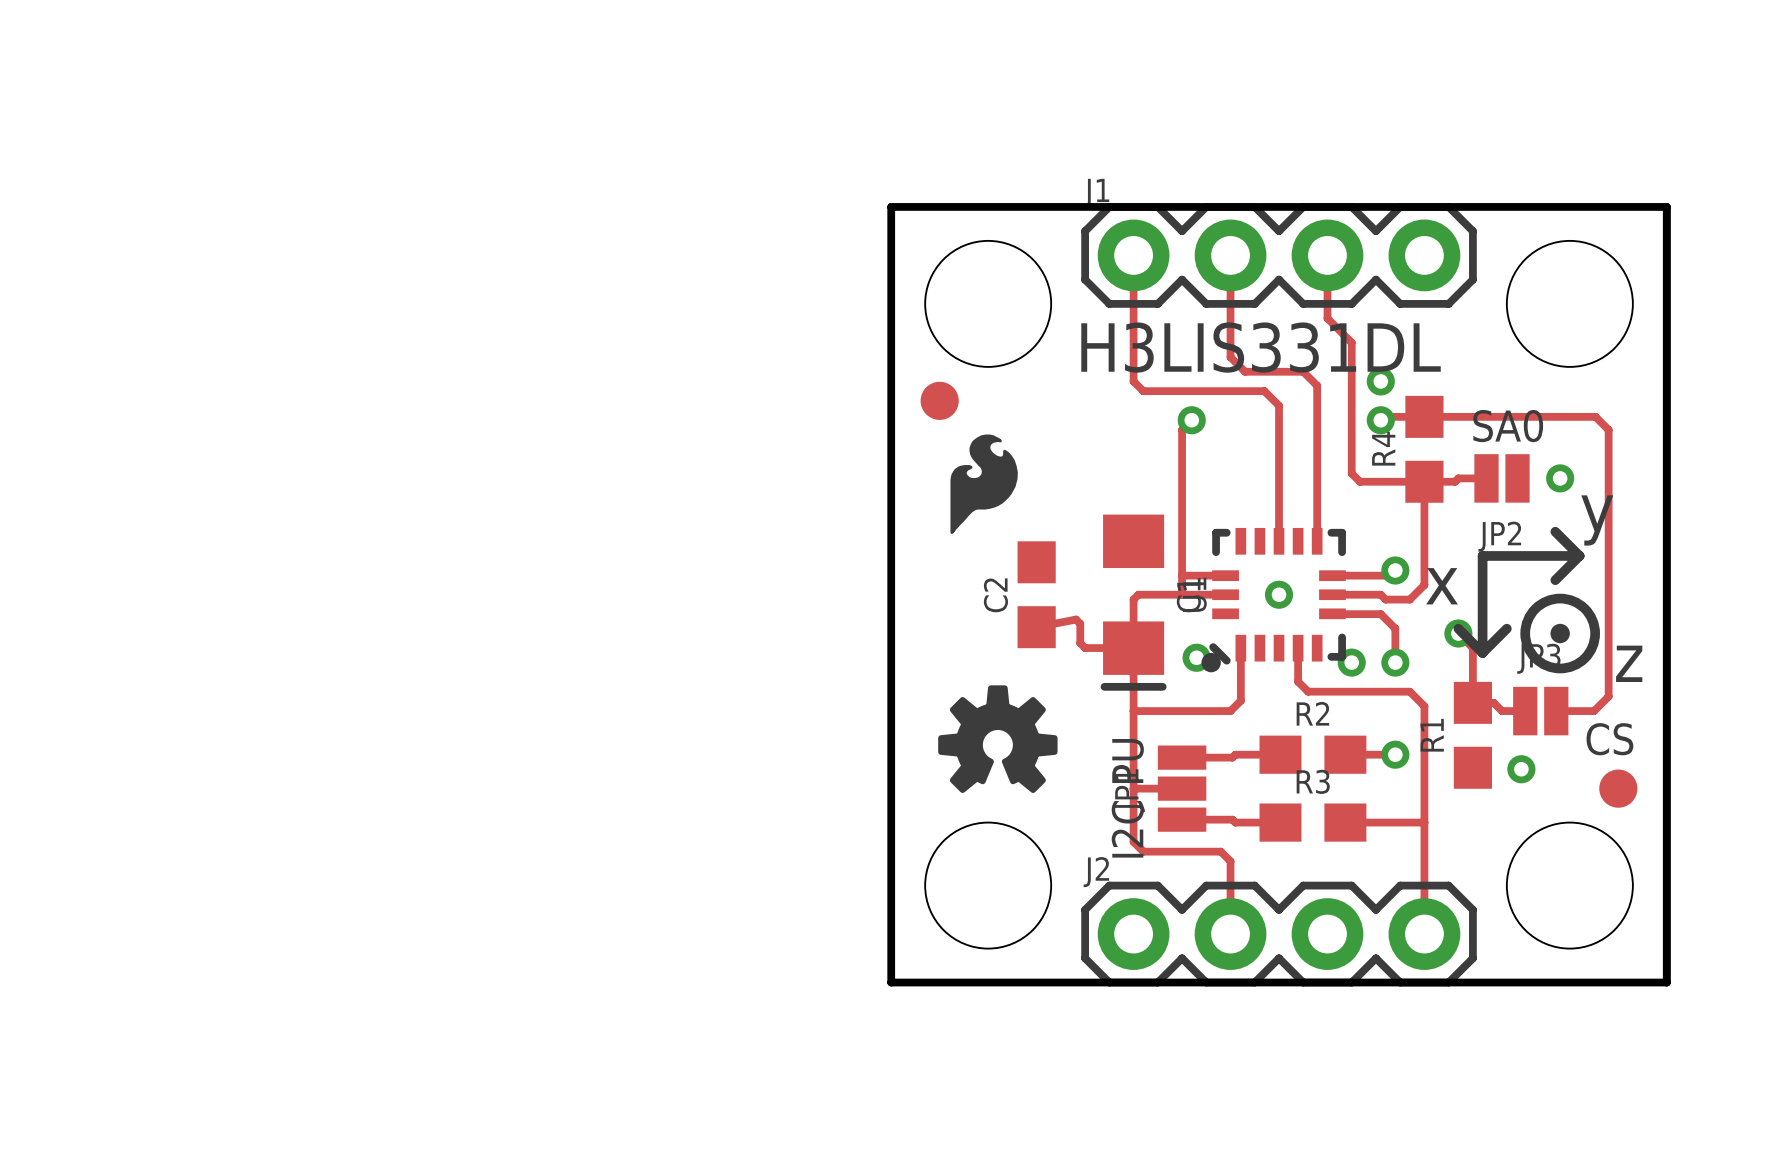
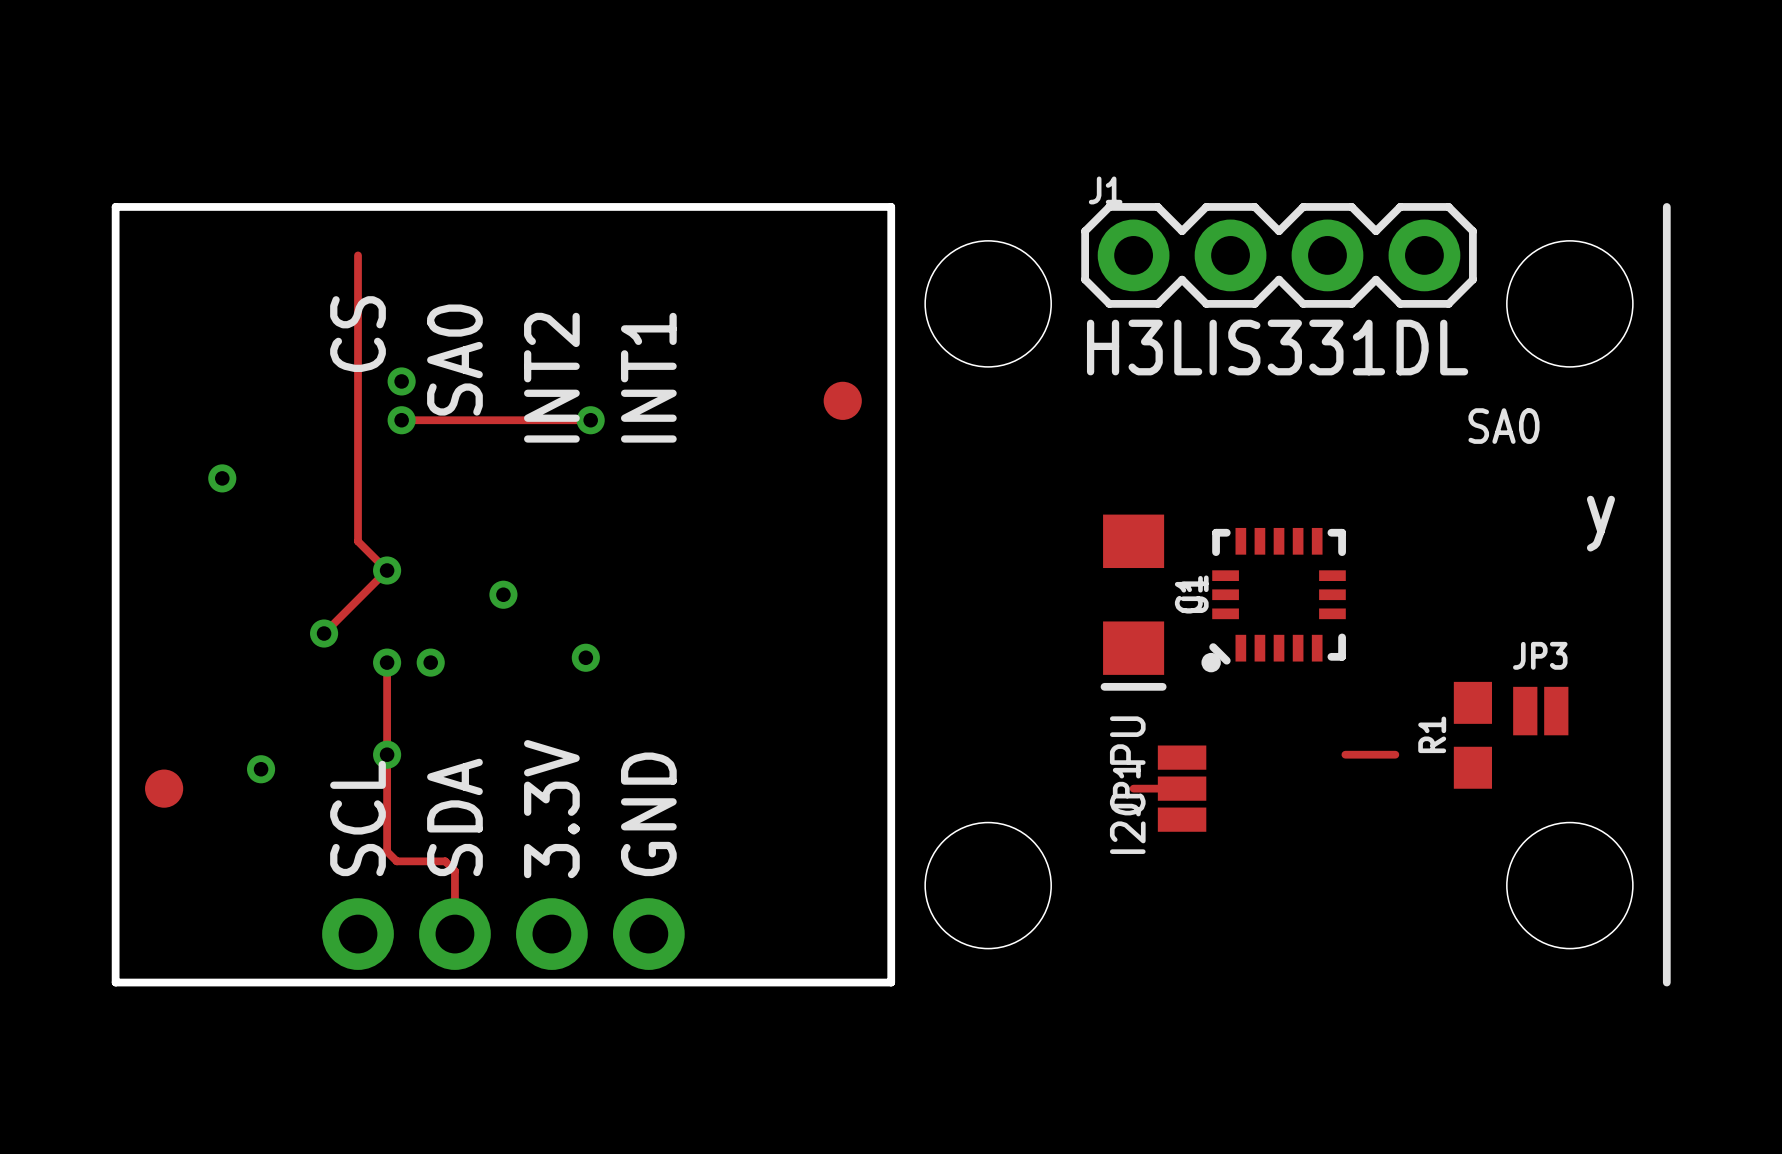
board edge: (891, 206) (1666, 206) (1666, 982) (891, 982) -> (891, 206) (115, 206) (115, 982) (891, 982)
track: none -> (358, 255) (358, 541) (387, 570) (324, 633)
track: (1133, 255) (1133, 381) (1143, 391) (1264, 391) (1279, 405) (1279, 541) -> none
track: (1230, 255) (1230, 357) (1245, 371) (1303, 371) (1317, 385) (1317, 541) -> none
track: (1327, 255) (1327, 318) (1351, 342) (1351, 473) (1359, 481) (1455, 481) (1458, 478) (1486, 478) -> none
text: none -> CS (358, 334)
text: none -> SA0 (454, 360)
via: none -> (401, 381)
via: (1380, 381) -> none
text: none -> INT2 (551, 377)
text: none -> INT1 (648, 377)
part position: (939, 400) -> (842, 400)
track: none -> (401, 420) (590, 420)
via: none -> (401, 420)
via: none -> (590, 420)
track: (1191, 420) (1182, 429) (1182, 594) -> none
via: (1191, 420) -> none
track: (1380, 420) (1384, 416) (1595, 416) (1608, 429) (1608, 696) (1594, 711) (1556, 711) -> none
via: (1380, 420) -> none
drawing: [950, 434, 1018, 534] -> none
R4: (1424, 449) -> none
via: none -> (222, 478)
JP2: (1502, 478) -> none
via: (1560, 478) -> none
track: (1424, 481) (1424, 585) (1409, 599) (1385, 599) (1380, 594) (1332, 594) -> none
line: (1555, 531) (1579, 555) -> none
line: (1579, 555) (1555, 580) -> none
line: (1579, 555) (1482, 555) (1482, 652) -> none
via: none -> (387, 570)
track: (1395, 570) (1390, 575) (1332, 575) -> none
via: (1395, 570) -> none
track: (1182, 575) (1225, 575) -> none
text: x (1442, 586) -> none
drawing: [1520, 593, 1600, 674] -> none
via: none -> (503, 594)
C2: (1036, 594) -> none
track: (1225, 594) (1138, 594) (1133, 599) (1133, 841) (1143, 851) (1220, 851) (1230, 861) (1230, 934) -> none
via: (1279, 594) -> none
track: (1332, 614) (1380, 614) (1395, 628) (1395, 662) -> none
track: (1036, 627) (1076, 619) (1080, 623) (1080, 643) (1085, 648) (1133, 648) -> none
line: (1458, 628) (1482, 652) -> none
line: (1506, 628) (1482, 652) -> none
via: none -> (324, 633)
track: (1458, 633) (1472, 648) (1472, 702) (1493, 702) (1502, 711) (1525, 711) -> none
via: (1458, 633) -> none
track: (1240, 648) (1240, 700) (1230, 711) (1133, 711) -> none
track: (1298, 648) (1298, 681) (1308, 691) (1409, 691) (1424, 706) (1424, 934) -> none
via: none -> (585, 657)
via: (1196, 657) -> none
track: none -> (387, 662) (387, 851) (396, 861) (445, 861) (454, 871) (454, 934)
via: none -> (387, 662)
via: none -> (430, 662)
via: (1351, 662) -> none
via: (1395, 662) -> none
text: z (1629, 663) -> none
drawing: [938, 685, 1058, 793] -> none
text: CS (1609, 739) -> none
via: none -> (387, 754)
track: (1280, 754) (1182, 757) -> none
R2: (1312, 754) -> none
via: (1395, 754) -> none
via: none -> (261, 769)
via: (1521, 769) -> none
part: none -> (164, 788)
part: (1618, 788) -> none
text: none -> 3.3V (551, 809)
text: none -> GND (648, 814)
track: (1182, 819) (1280, 822) -> none
text: none -> SDA (454, 817)
R3: (1312, 822) -> none
track: (1345, 822) (1424, 822) -> none
text: none -> SCL (358, 818)
J2 side: top (1279, 934) -> bottom (503, 934)

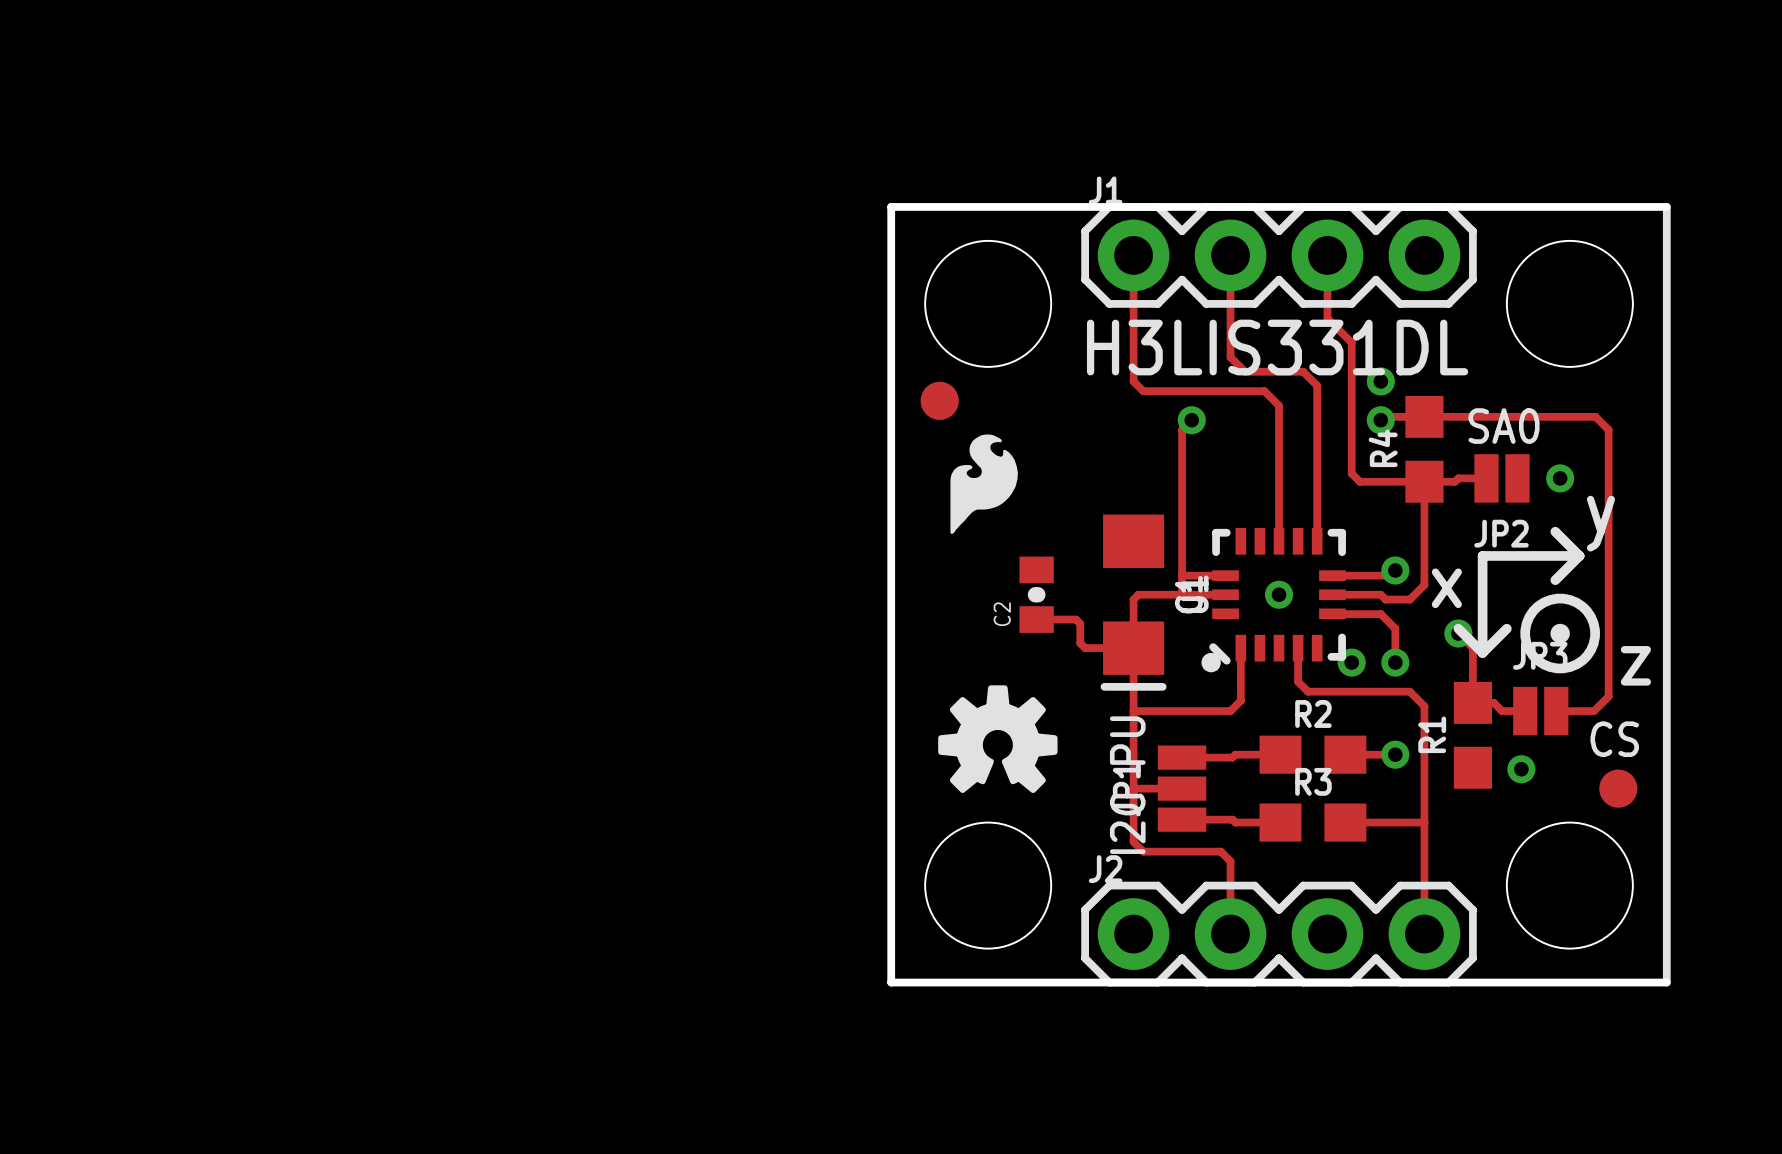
board edge: (891, 206) (115, 206) (115, 982) (891, 982) -> (891, 206) (1666, 206)
track: (358, 255) (358, 541) (387, 570) (324, 633) -> none
track: none -> (1133, 255) (1133, 381) (1143, 391) (1264, 391) (1279, 405) (1279, 541)
track: none -> (1230, 255) (1230, 357) (1245, 371) (1303, 371) (1317, 385) (1317, 541)
track: none -> (1327, 255) (1327, 318) (1351, 342) (1351, 473) (1359, 481) (1455, 481) (1458, 478) (1486, 478)
text: CS (358, 334) -> none
text: SA0 (454, 360) -> none
text: INT2 (551, 377) -> none
text: INT1 (648, 377) -> none
via: (401, 381) -> none
via: none -> (1380, 381)
part position: (842, 400) -> (939, 400)
track: (401, 420) (590, 420) -> none
via: (401, 420) -> none
via: (590, 420) -> none
track: none -> (1191, 420) (1182, 429) (1182, 594)
via: none -> (1191, 420)
track: none -> (1380, 420) (1384, 416) (1595, 416) (1608, 429) (1608, 696) (1594, 711) (1556, 711)
via: none -> (1380, 420)
drawing: none -> [950, 434, 1018, 534]
R4: none -> (1424, 449)
via: (222, 478) -> none
JP2: none -> (1502, 478)
via: none -> (1560, 478)
track: none -> (1424, 481) (1424, 585) (1409, 599) (1385, 599) (1380, 594) (1332, 594)
line: none -> (1555, 531) (1579, 555)
line: none -> (1579, 555) (1555, 580)
line: none -> (1579, 555) (1482, 555) (1482, 652)
via: (387, 570) -> none
track: none -> (1395, 570) (1390, 575) (1332, 575)
via: none -> (1395, 570)
track: none -> (1182, 575) (1225, 575)
text: none -> x (1446, 588)
drawing: none -> [1520, 593, 1600, 674]
via: (503, 594) -> none
C2: none -> (1036, 594)
track: none -> (1225, 594) (1138, 594) (1133, 599) (1133, 841) (1143, 851) (1220, 851) (1230, 861) (1230, 934)
via: none -> (1279, 594)
track: none -> (1332, 614) (1380, 614) (1395, 628) (1395, 662)
track: none -> (1036, 619) (1076, 619) (1080, 623) (1080, 643) (1085, 648) (1133, 648)
line: none -> (1458, 628) (1482, 652)
line: none -> (1506, 628) (1482, 652)
via: (324, 633) -> none
track: none -> (1458, 633) (1472, 648) (1472, 702) (1493, 702) (1502, 711) (1525, 711)
via: none -> (1458, 633)
track: none -> (1240, 648) (1240, 700) (1230, 711) (1133, 711)
track: none -> (1298, 648) (1298, 681) (1308, 691) (1409, 691) (1424, 706) (1424, 934)
via: (585, 657) -> none
track: (387, 662) (387, 851) (396, 861) (445, 861) (454, 871) (454, 934) -> none
via: (387, 662) -> none
via: (430, 662) -> none
via: none -> (1351, 662)
via: none -> (1395, 662)
text: none -> z (1635, 665)
drawing: none -> [938, 685, 1058, 793]
text: none -> CS (1614, 739)
via: (387, 754) -> none
track: none -> (1280, 754) (1182, 757)
R2: none -> (1312, 754)
via: none -> (1395, 754)
via: (261, 769) -> none
via: none -> (1521, 769)
part: (164, 788) -> none
part: none -> (1618, 788)
text: 3.3V (551, 809) -> none
text: GND (648, 814) -> none
text: SDA (454, 817) -> none
text: SCL (358, 818) -> none
track: none -> (1182, 819) (1280, 822)
R3: none -> (1312, 822)
track: none -> (1345, 822) (1424, 822)
J2 side: bottom (503, 934) -> top (1279, 934)
board edge: none -> (891, 982) (1666, 982)

